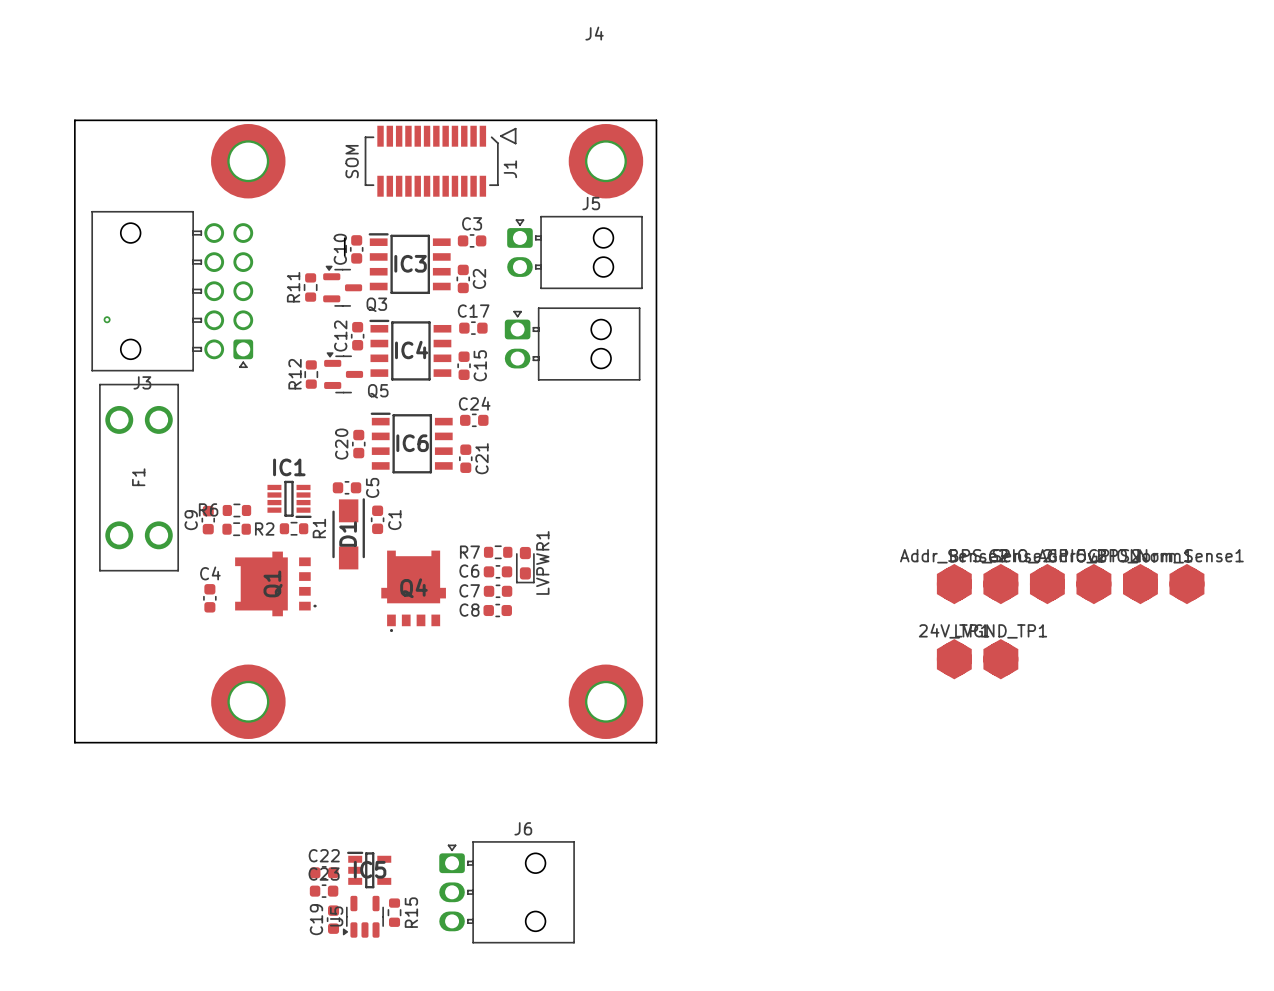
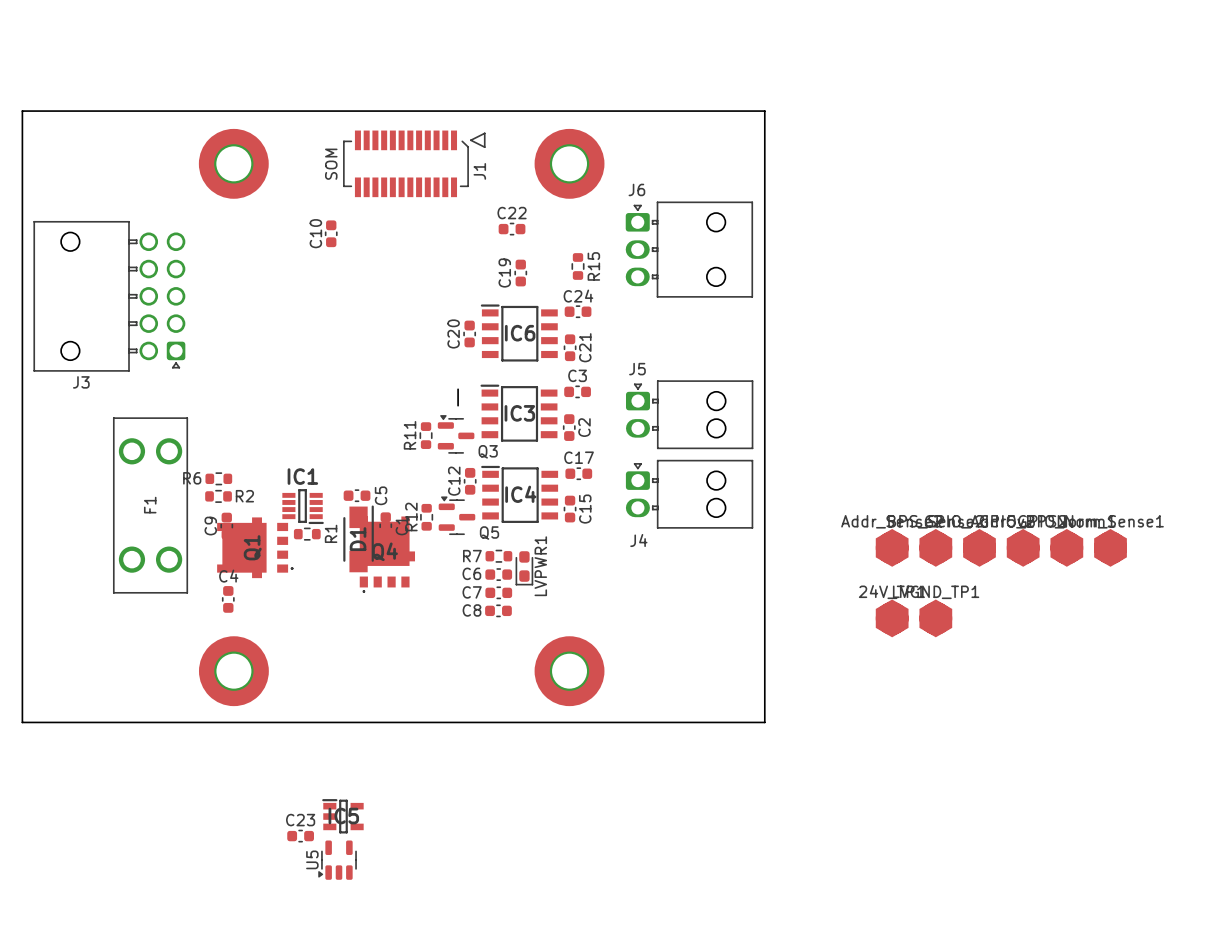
J4 name position: J4 (594, 33) -> J4 (638, 540)
board edge: (74, 120) (656, 120) (656, 742) (74, 742) (74, 120) -> (22, 111) (22, 722) (764, 722) (764, 111) (22, 111)
J5 name position: J5 (591, 203) -> J5 (637, 369)
board edge: (344, 238) (344, 255) -> (458, 389) (458, 405)
C3 position: (472, 240) -> (577, 391)
J5 position: (574, 252) -> (689, 414)
IC3 position: (409, 263) -> (518, 413)
C2 position: (463, 278) -> (569, 427)
Q3 position: (342, 286) -> (456, 434)
R11 position: (310, 287) -> (426, 435)
J3 position: (172, 291) -> (109, 296)
via: (107, 319) -> none
C17 position: (473, 328) -> (578, 473)
C12 position: (357, 336) -> (470, 481)
J4 position: (572, 344) -> (689, 494)
IC4 position: (410, 350) -> (519, 494)
C15 position: (464, 365) -> (570, 509)
Q5 position: (343, 372) -> (456, 515)
R12 position: (311, 374) -> (426, 517)
C24 position: (474, 420) -> (578, 311)
J1 position: (427, 431) -> (401, 417)
IC6 position: (411, 443) -> (519, 333)
C20 position: (358, 444) -> (469, 333)
C21 position: (465, 458) -> (570, 347)
F1 position: (139, 477) -> (150, 505)
C5 position: (347, 487) -> (357, 495)
IC1 position: (289, 499) -> (303, 506)
C1 position: (377, 519) -> (385, 525)
C9 position: (208, 520) -> (226, 526)
R1 position: (294, 528) -> (307, 534)
D1 position: (348, 533) -> (358, 538)
R7 position: (498, 552) -> (498, 556)
LVPWR1 position: (525, 565) -> (524, 568)
C6 position: (497, 571) -> (498, 574)
C7 position: (498, 591) -> (498, 592)
C4 position: (209, 598) -> (228, 599)
C8 position: (497, 610) -> (498, 610)
J6 name position: J6 (523, 828) -> J6 (636, 189)
C22 position: (324, 872) -> (512, 229)
J6 position: (507, 892) -> (689, 249)
R15 position: (394, 912) -> (578, 266)
C19 position: (333, 919) -> (520, 273)

